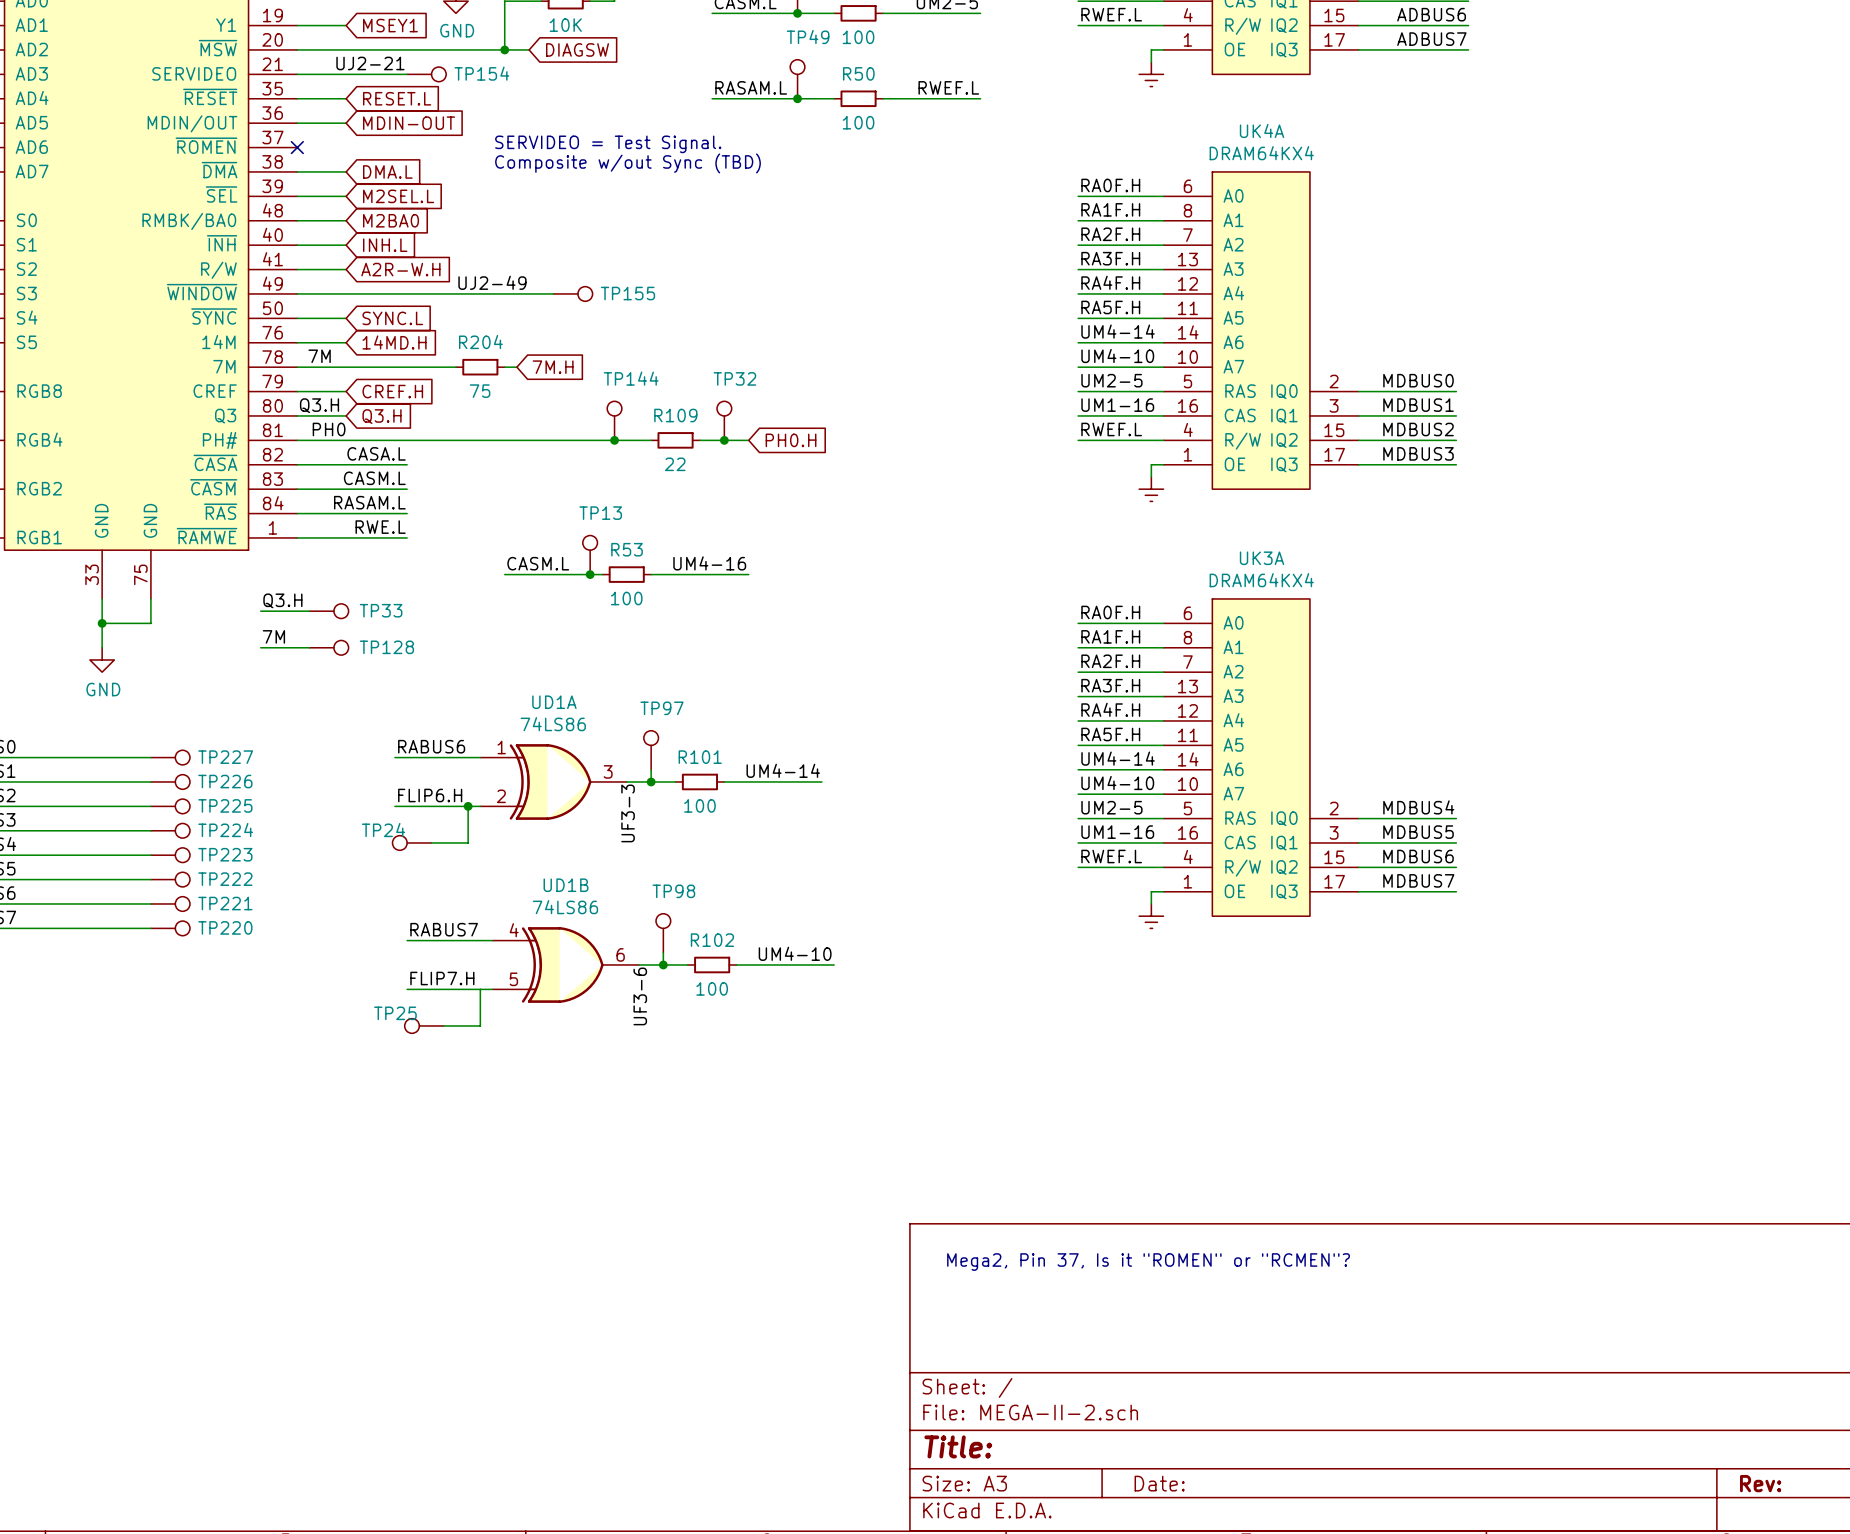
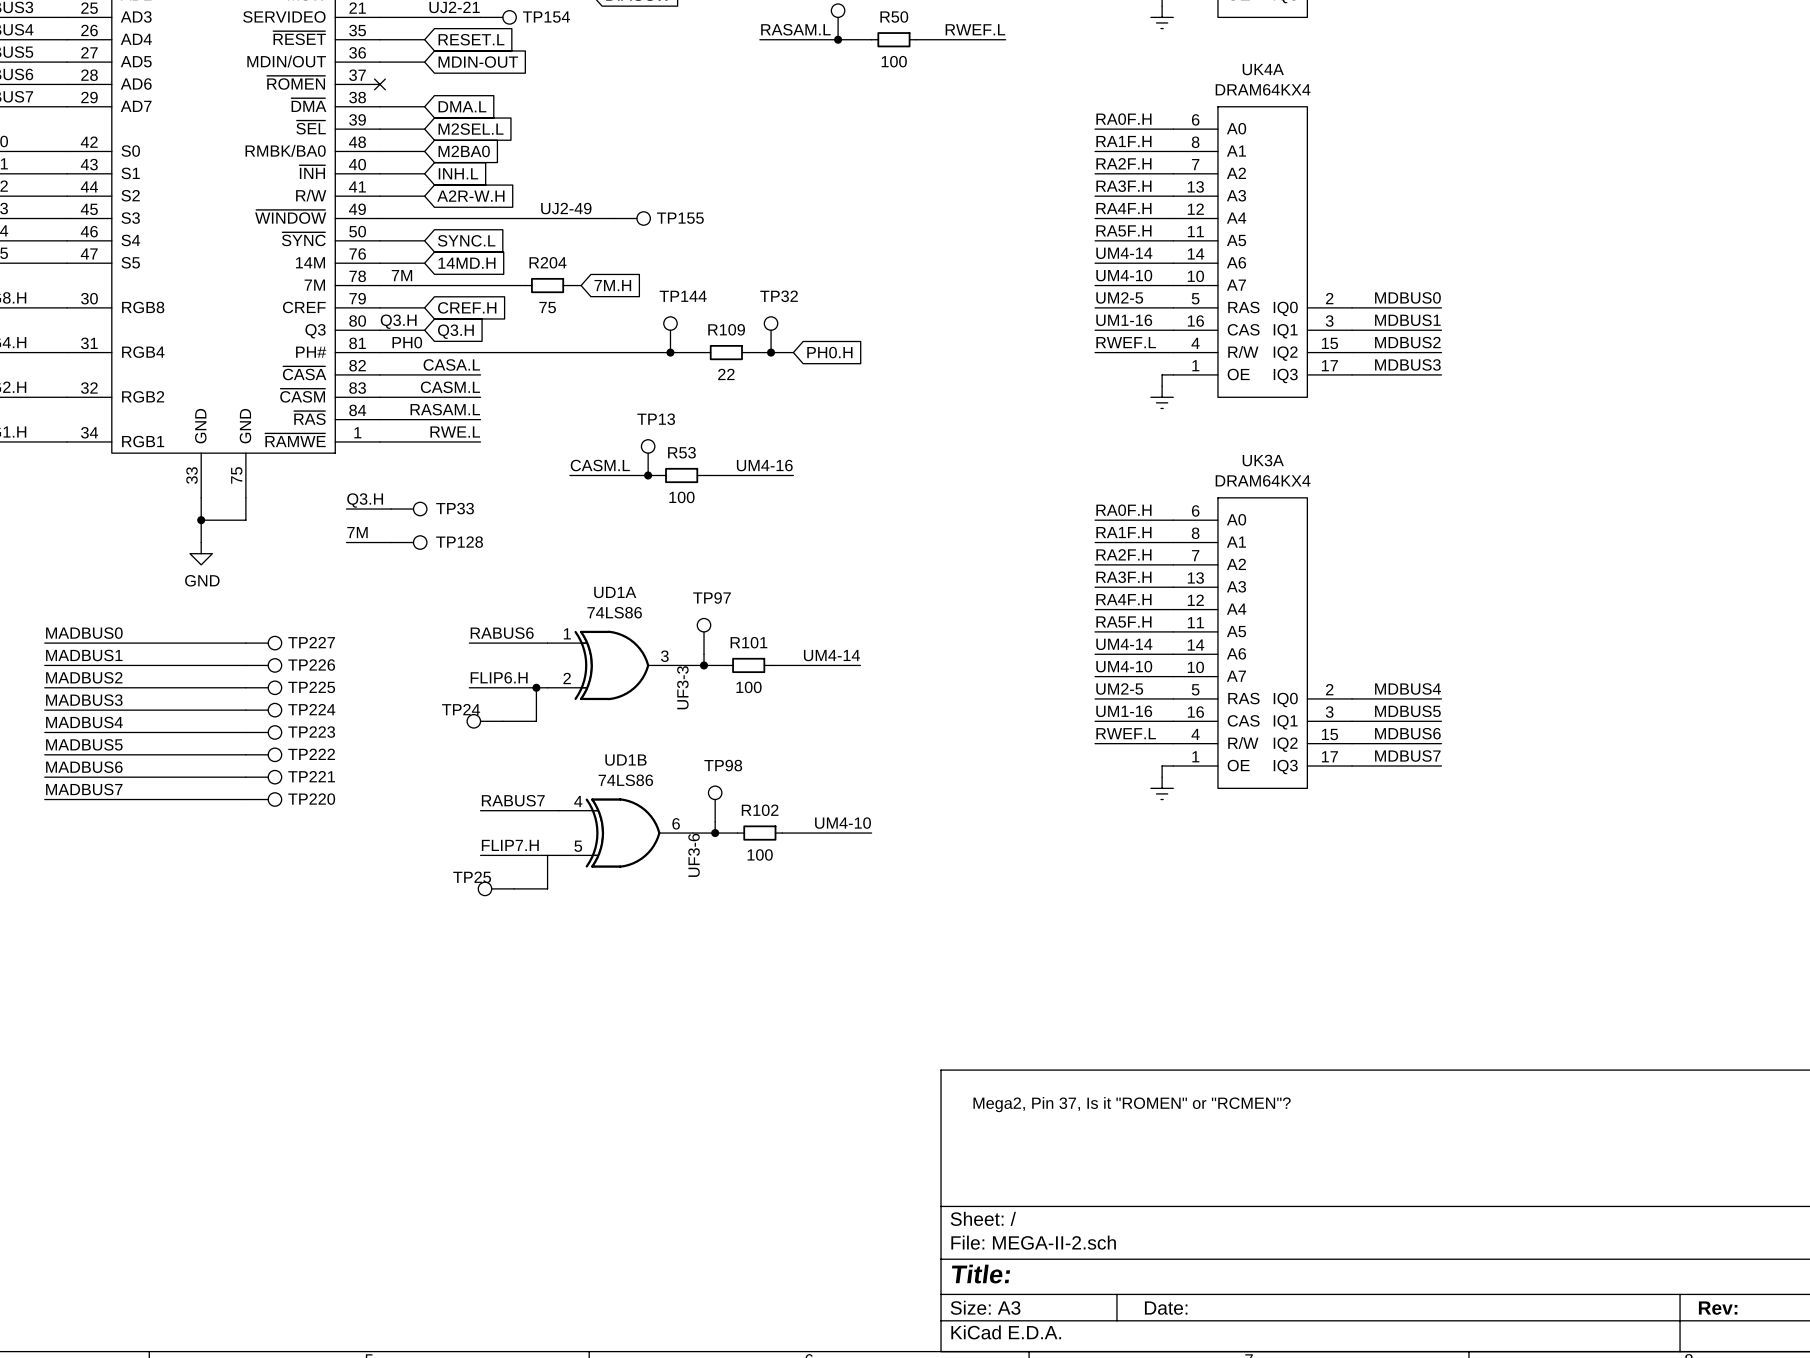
text: SERVIDEO = Test Signal. (608, 144) -> none
text: Composite w/out Sync (TBD) (627, 163) -> none

